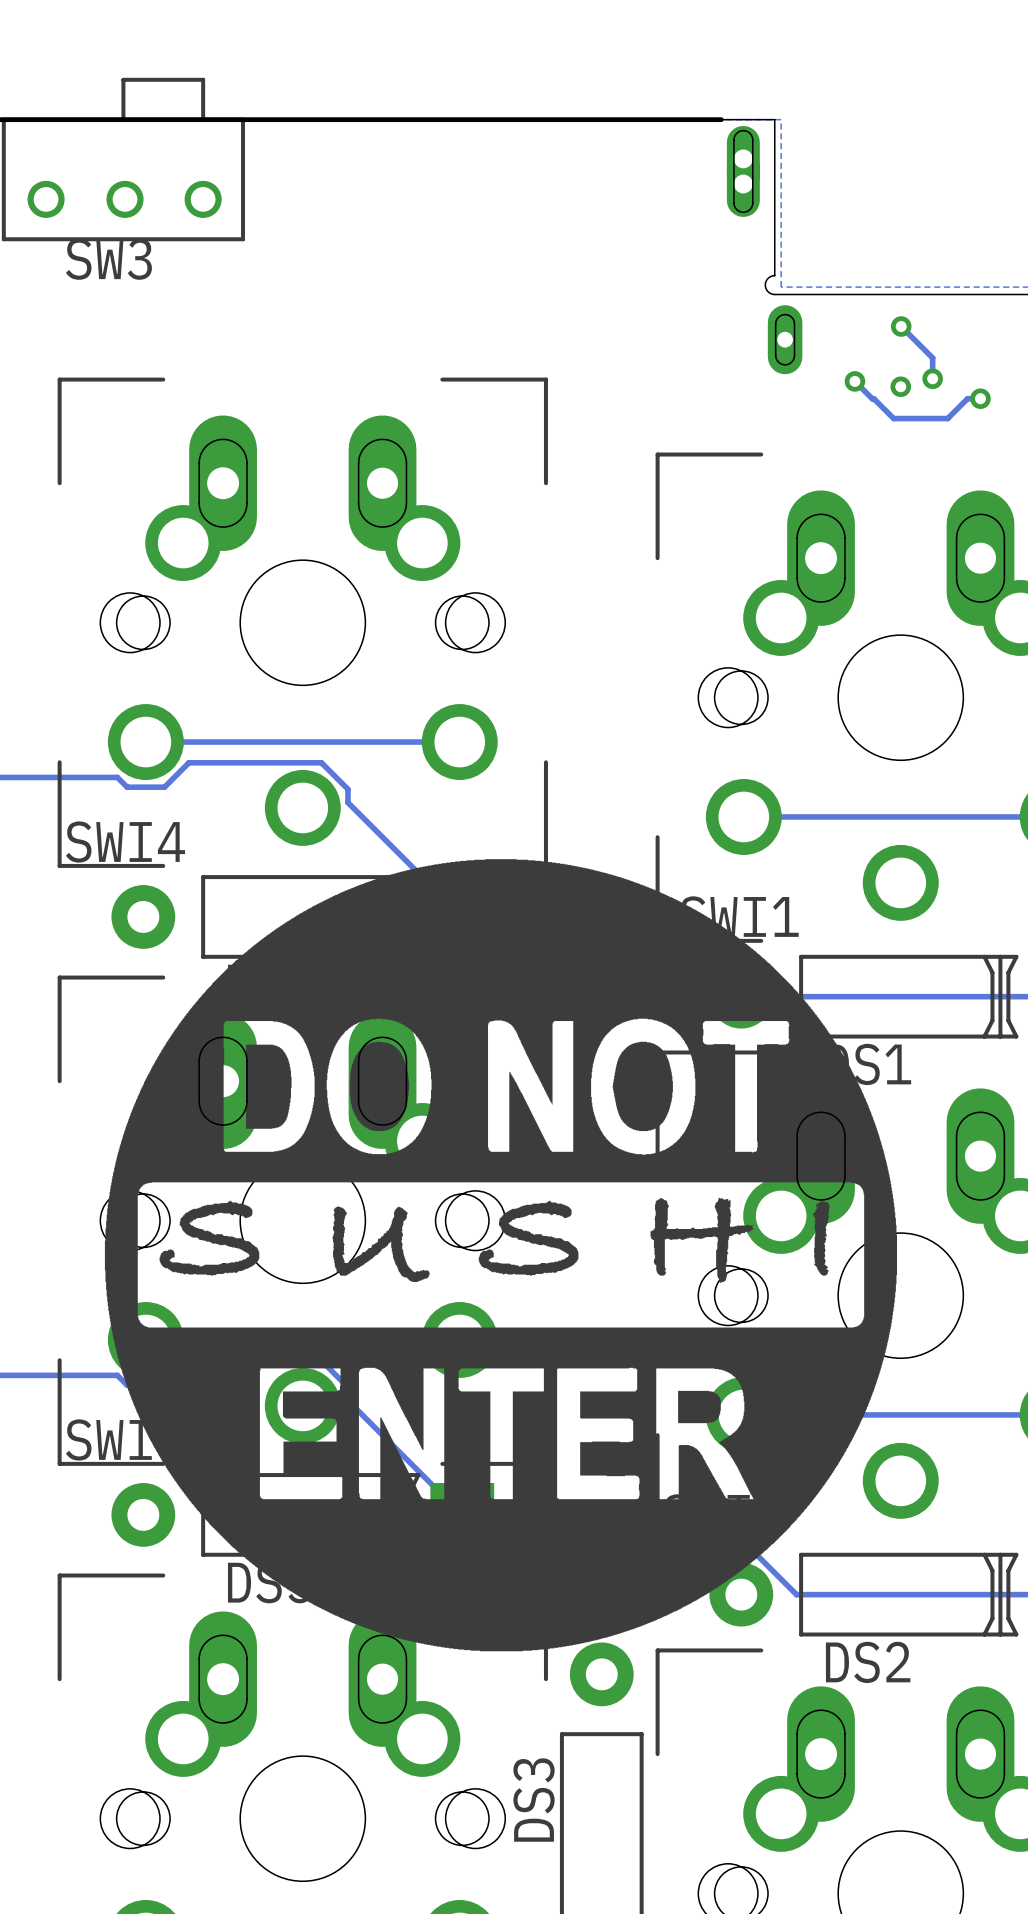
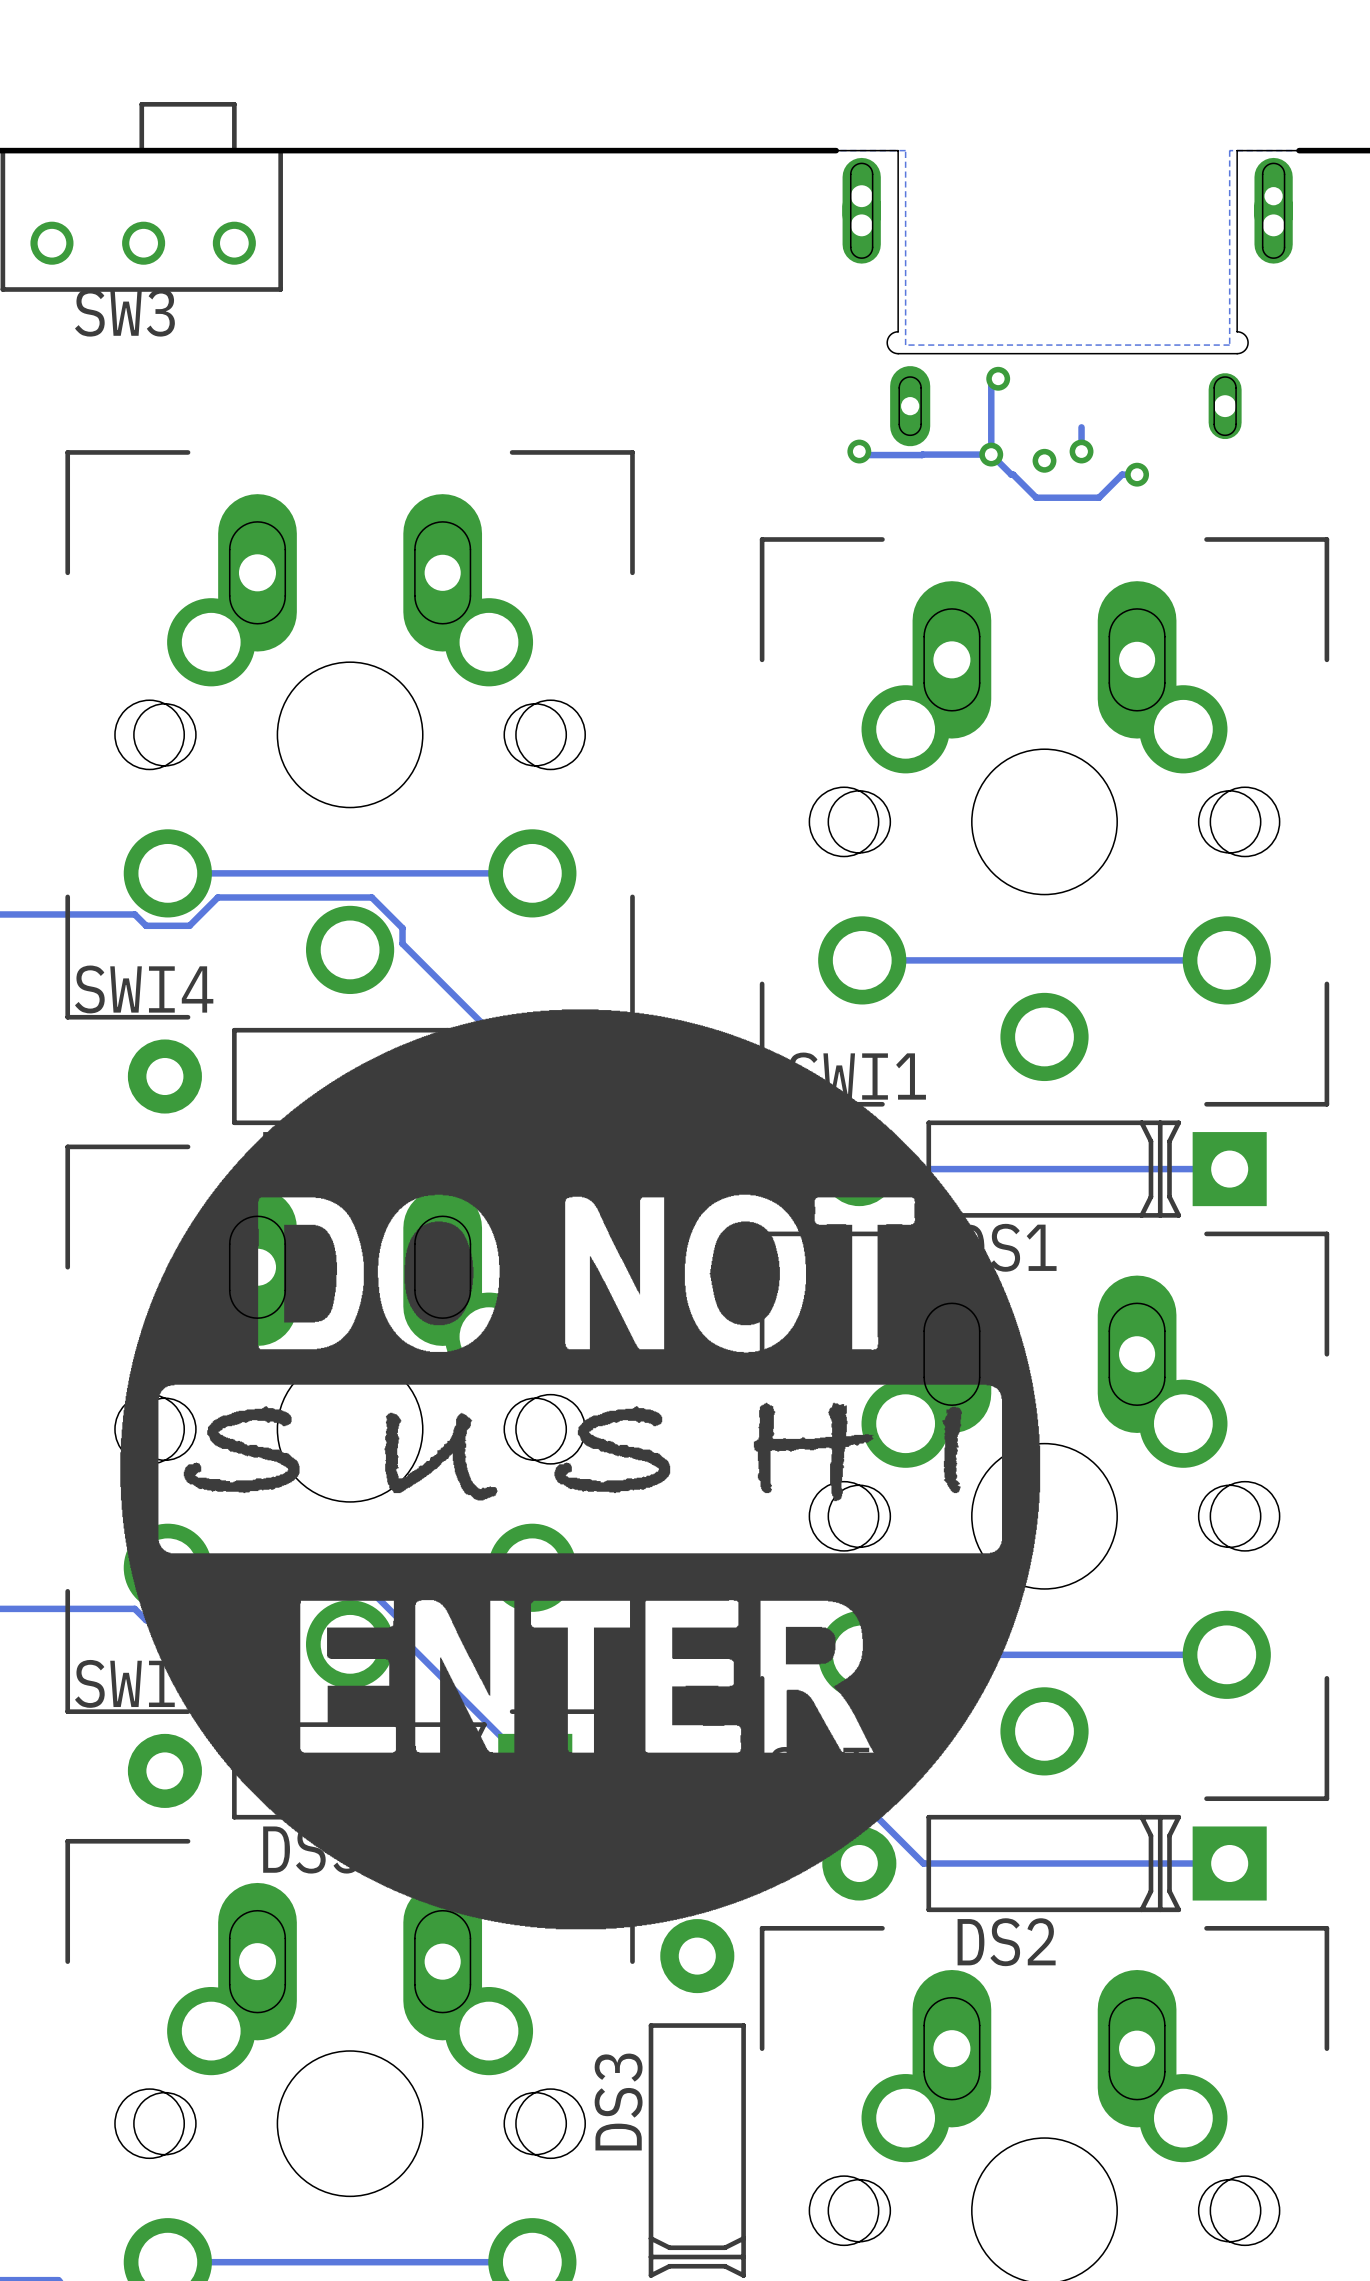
track: none -> (998, 378) (991, 385) (991, 454) (922, 454)
track: (901, 326) (932, 357) -> none
via position: (901, 326) -> (998, 378)
track: none -> (859, 451) (862, 455) (922, 455)
via: none -> (859, 451)

